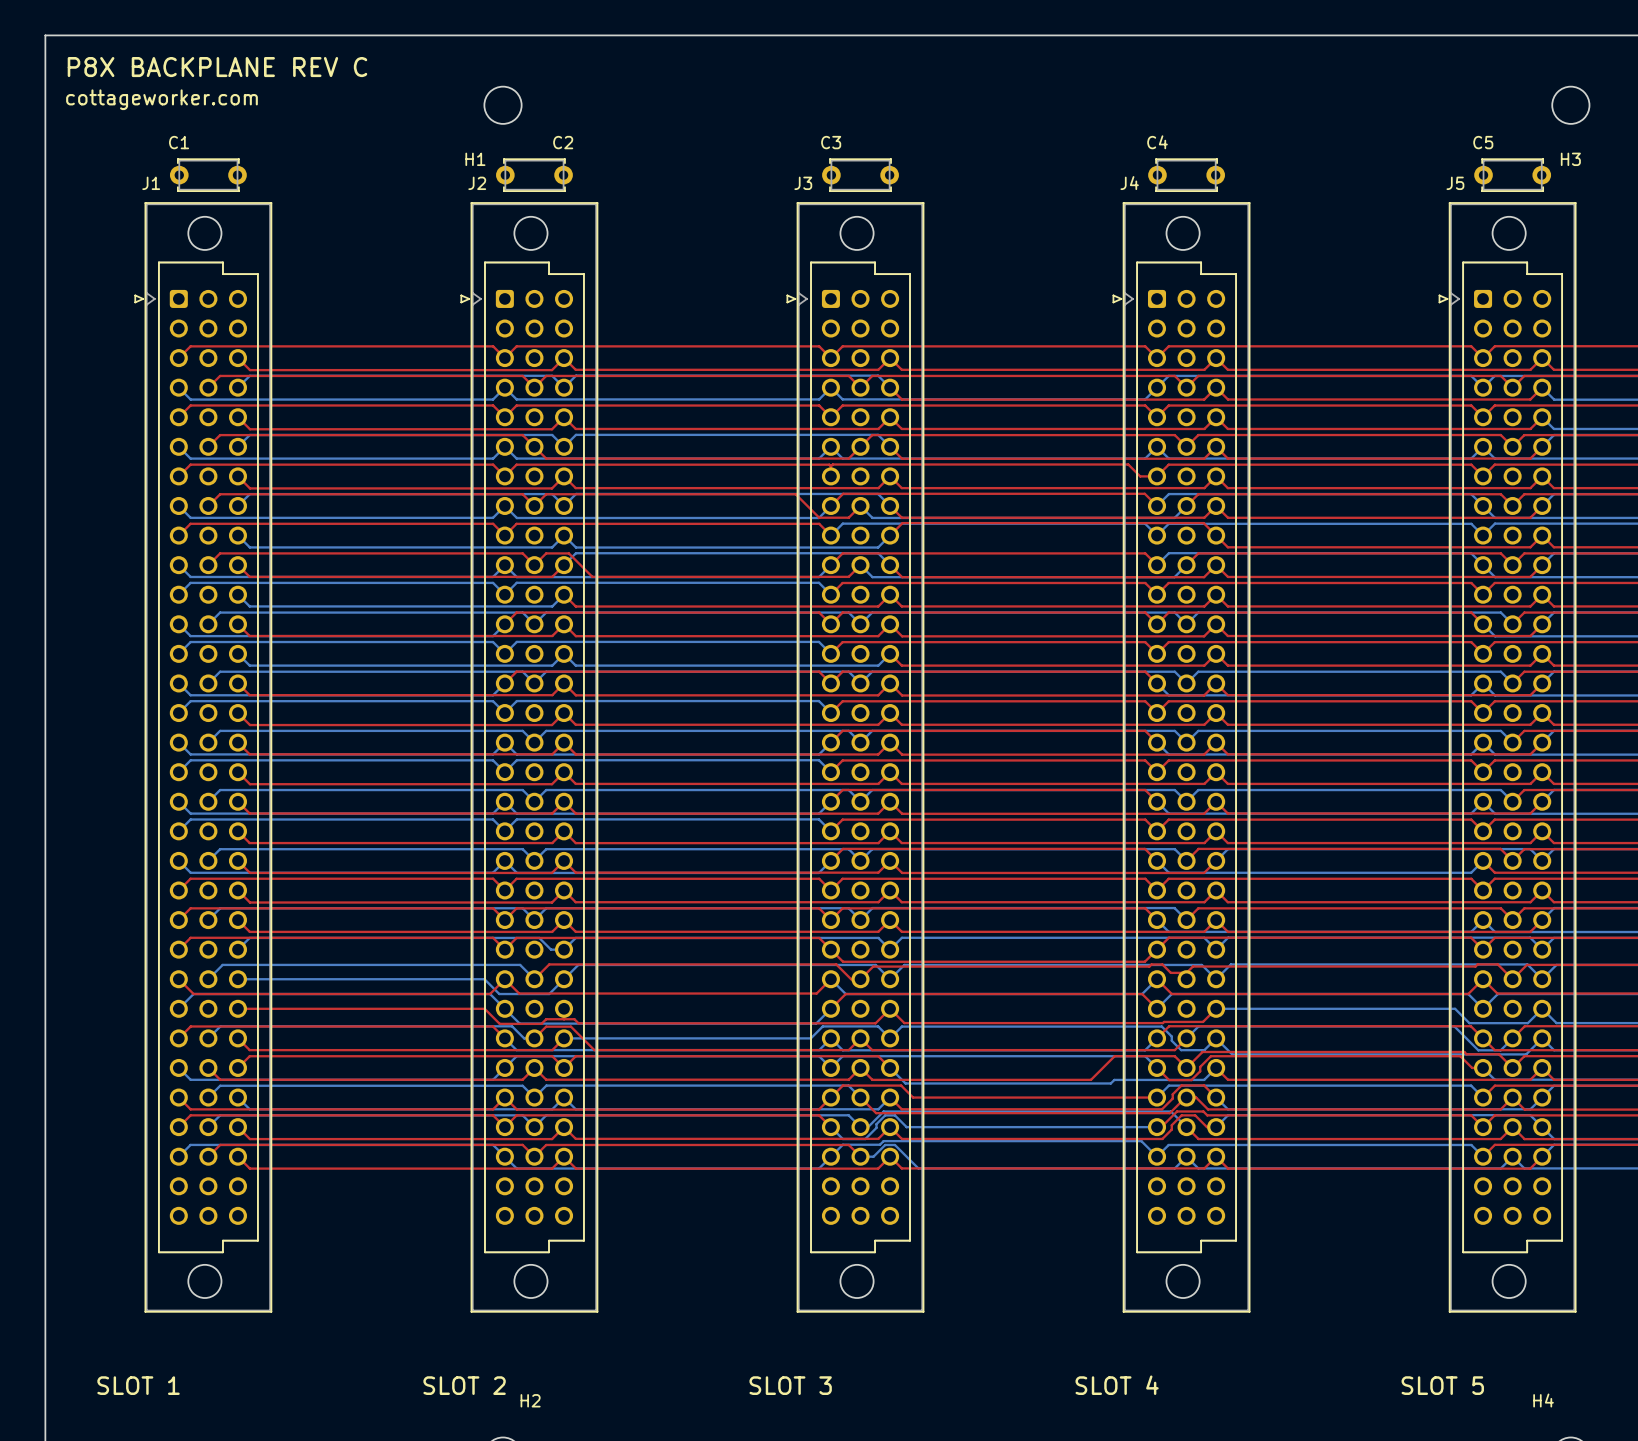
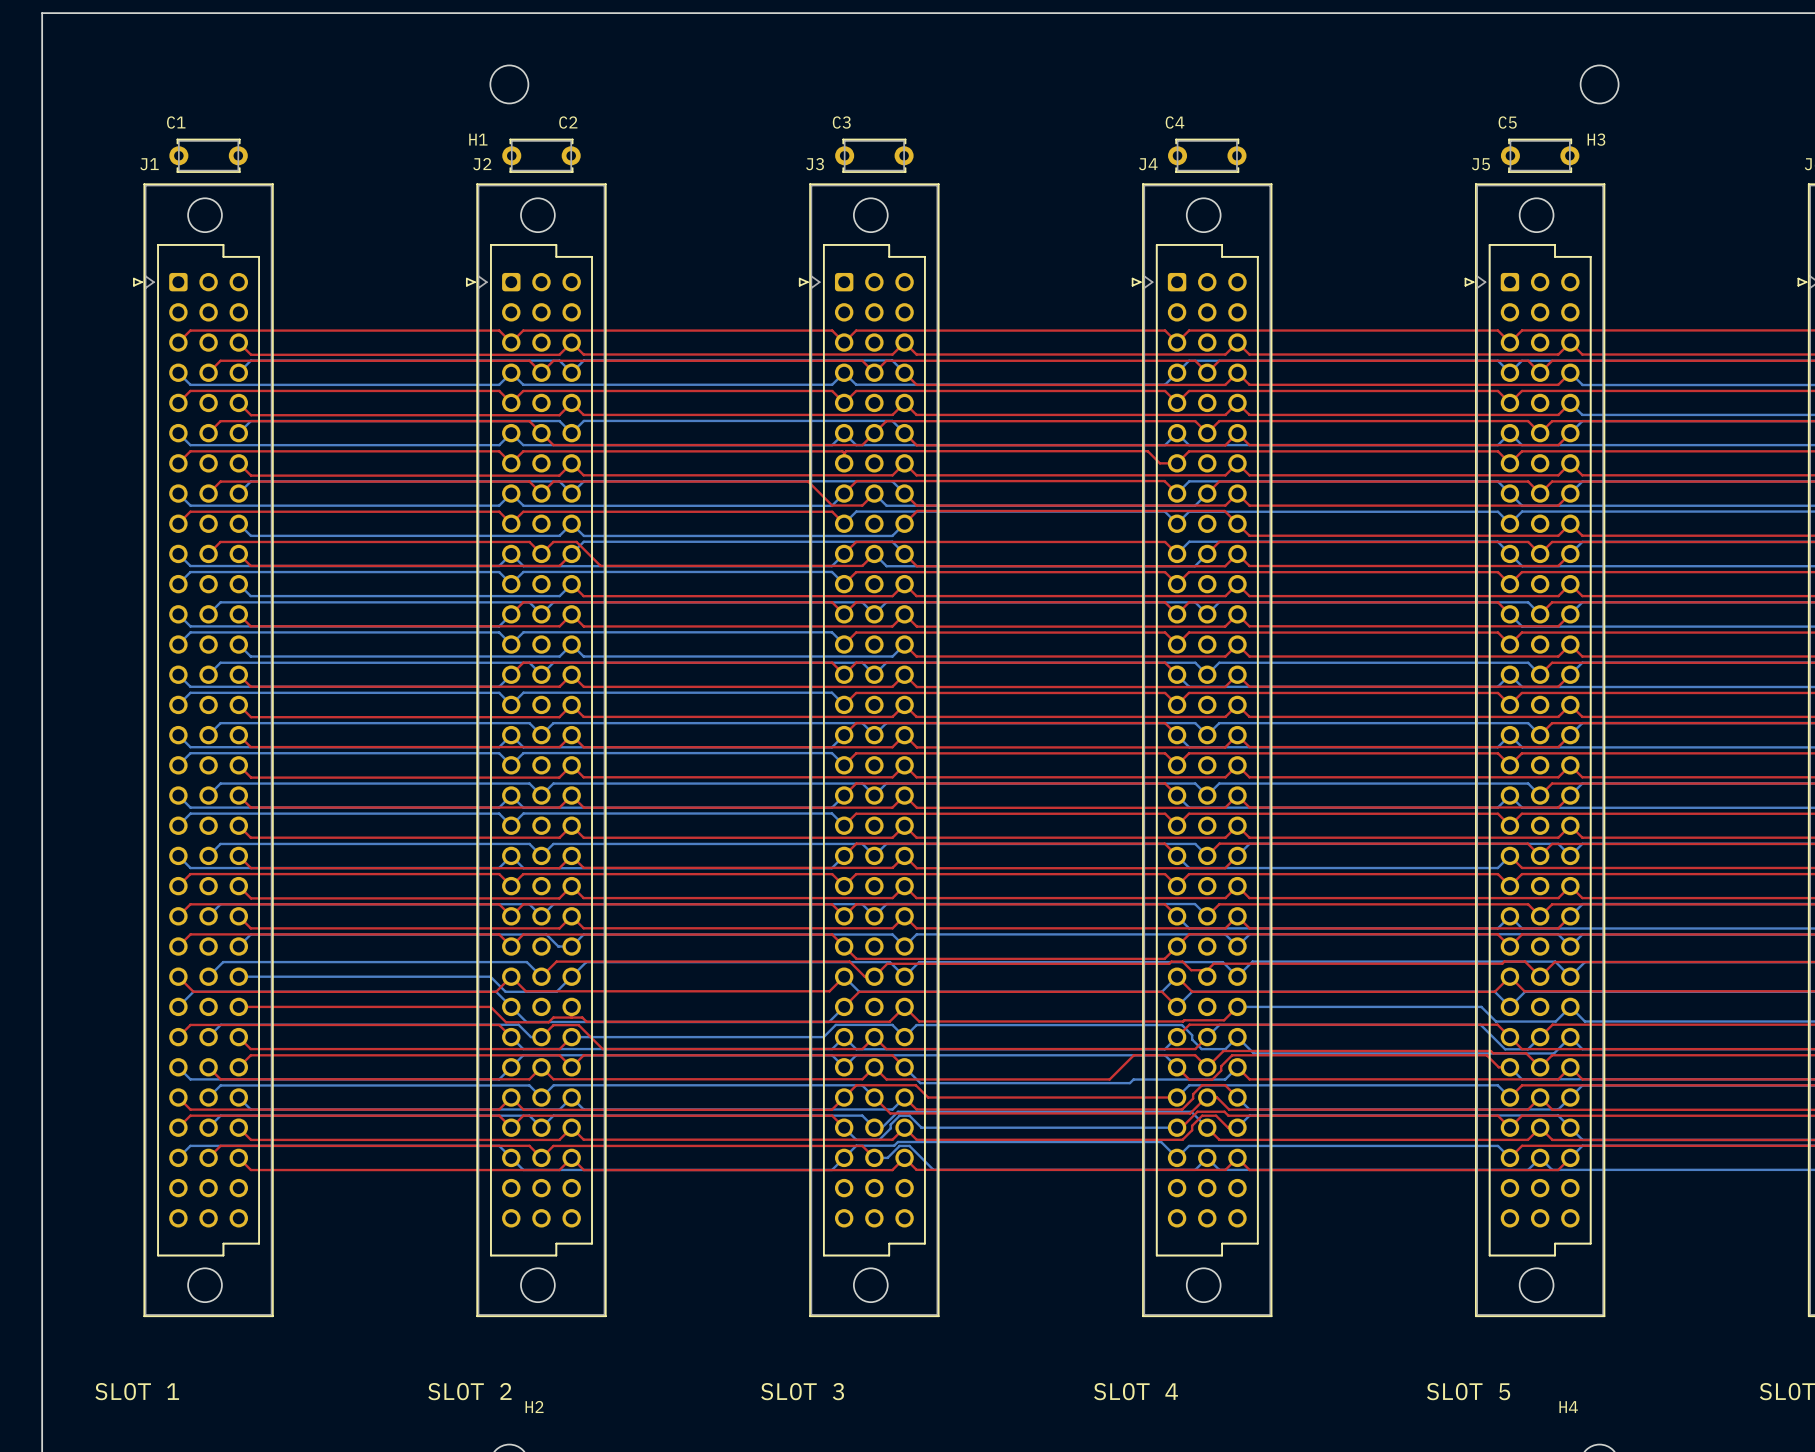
text: P8X BACKPLANE REV C (217, 67) -> none
text: cottageworker.com (161, 99) -> none

